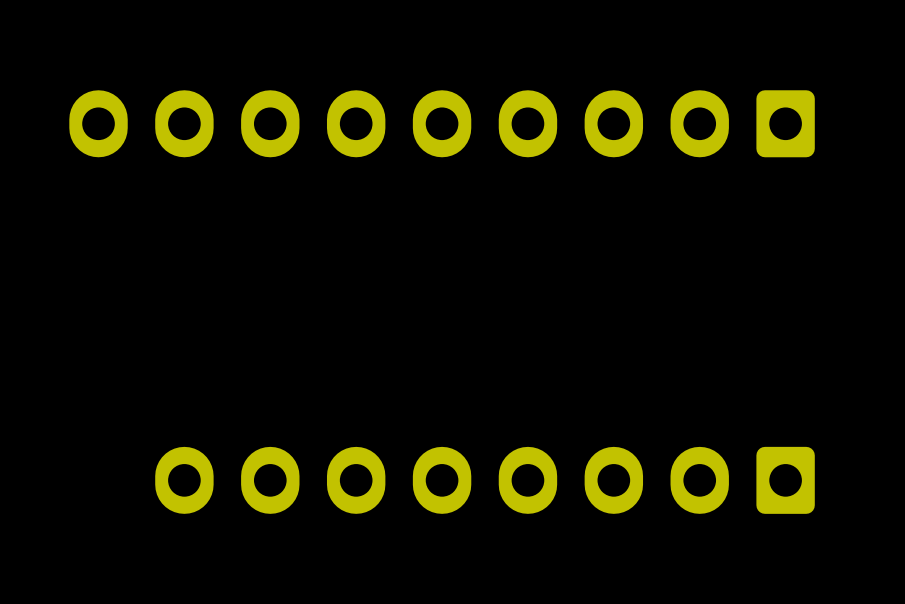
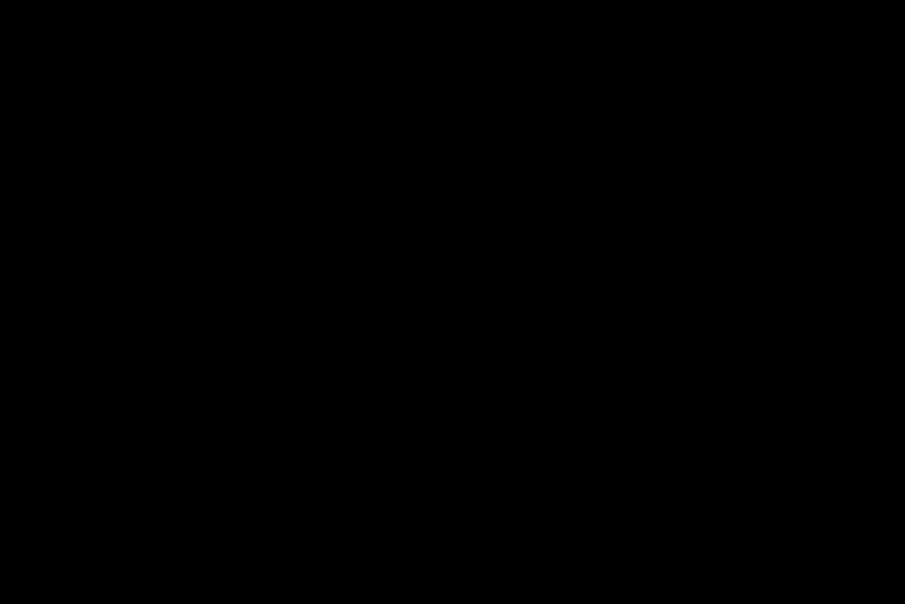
part: (442, 123) -> none
part: (485, 480) -> none

